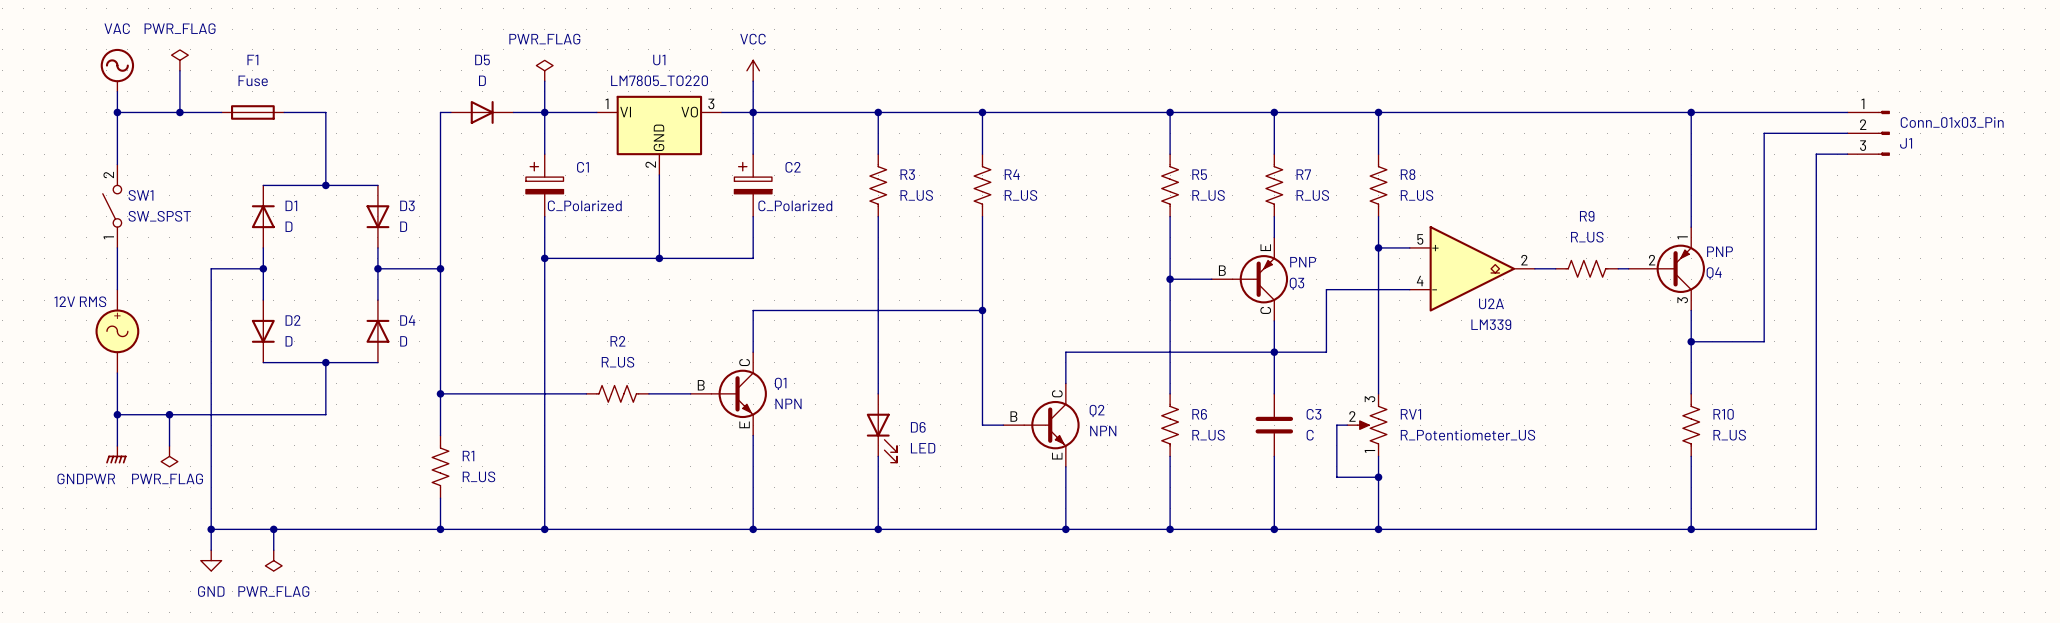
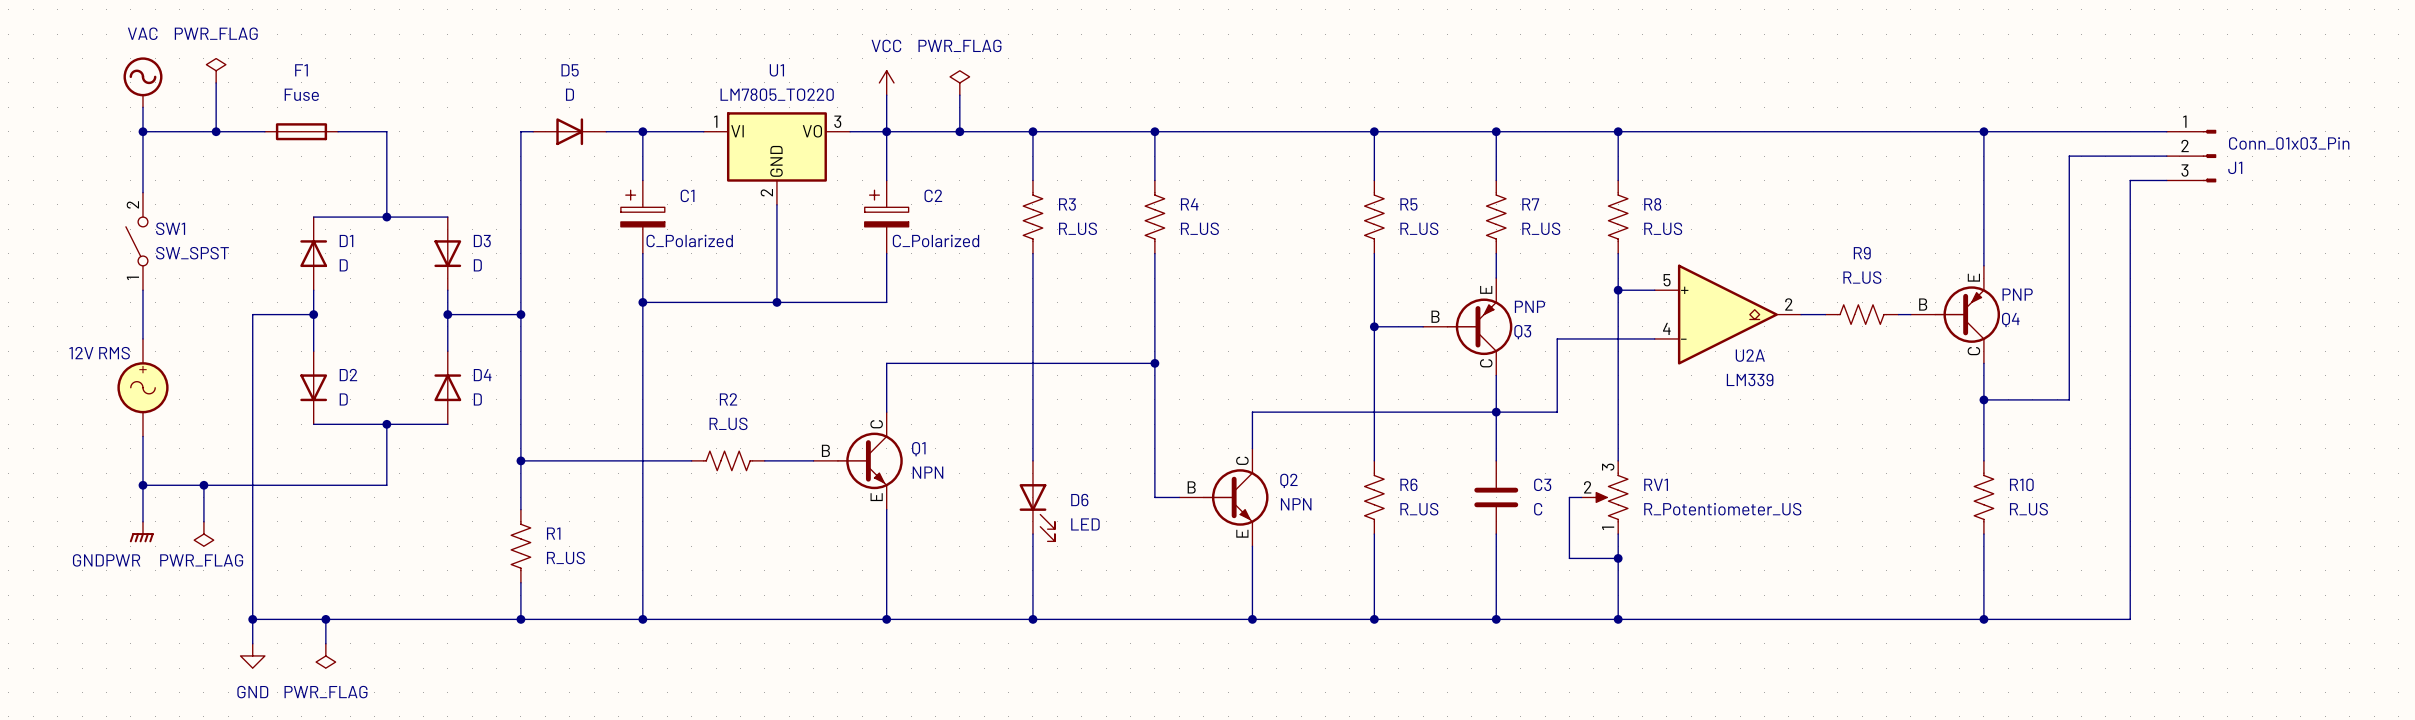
power symbol: PWR_FLAG (544, 70) -> none
power symbol: none -> PWR_FLAG (959, 82)
wire: (544, 81) (544, 112) -> none
wire: none -> (959, 95) (959, 131)
junction: none -> (959, 131)
Q4 symbol: [1628, 227, 1705, 311] -> [1910, 265, 2001, 364]

